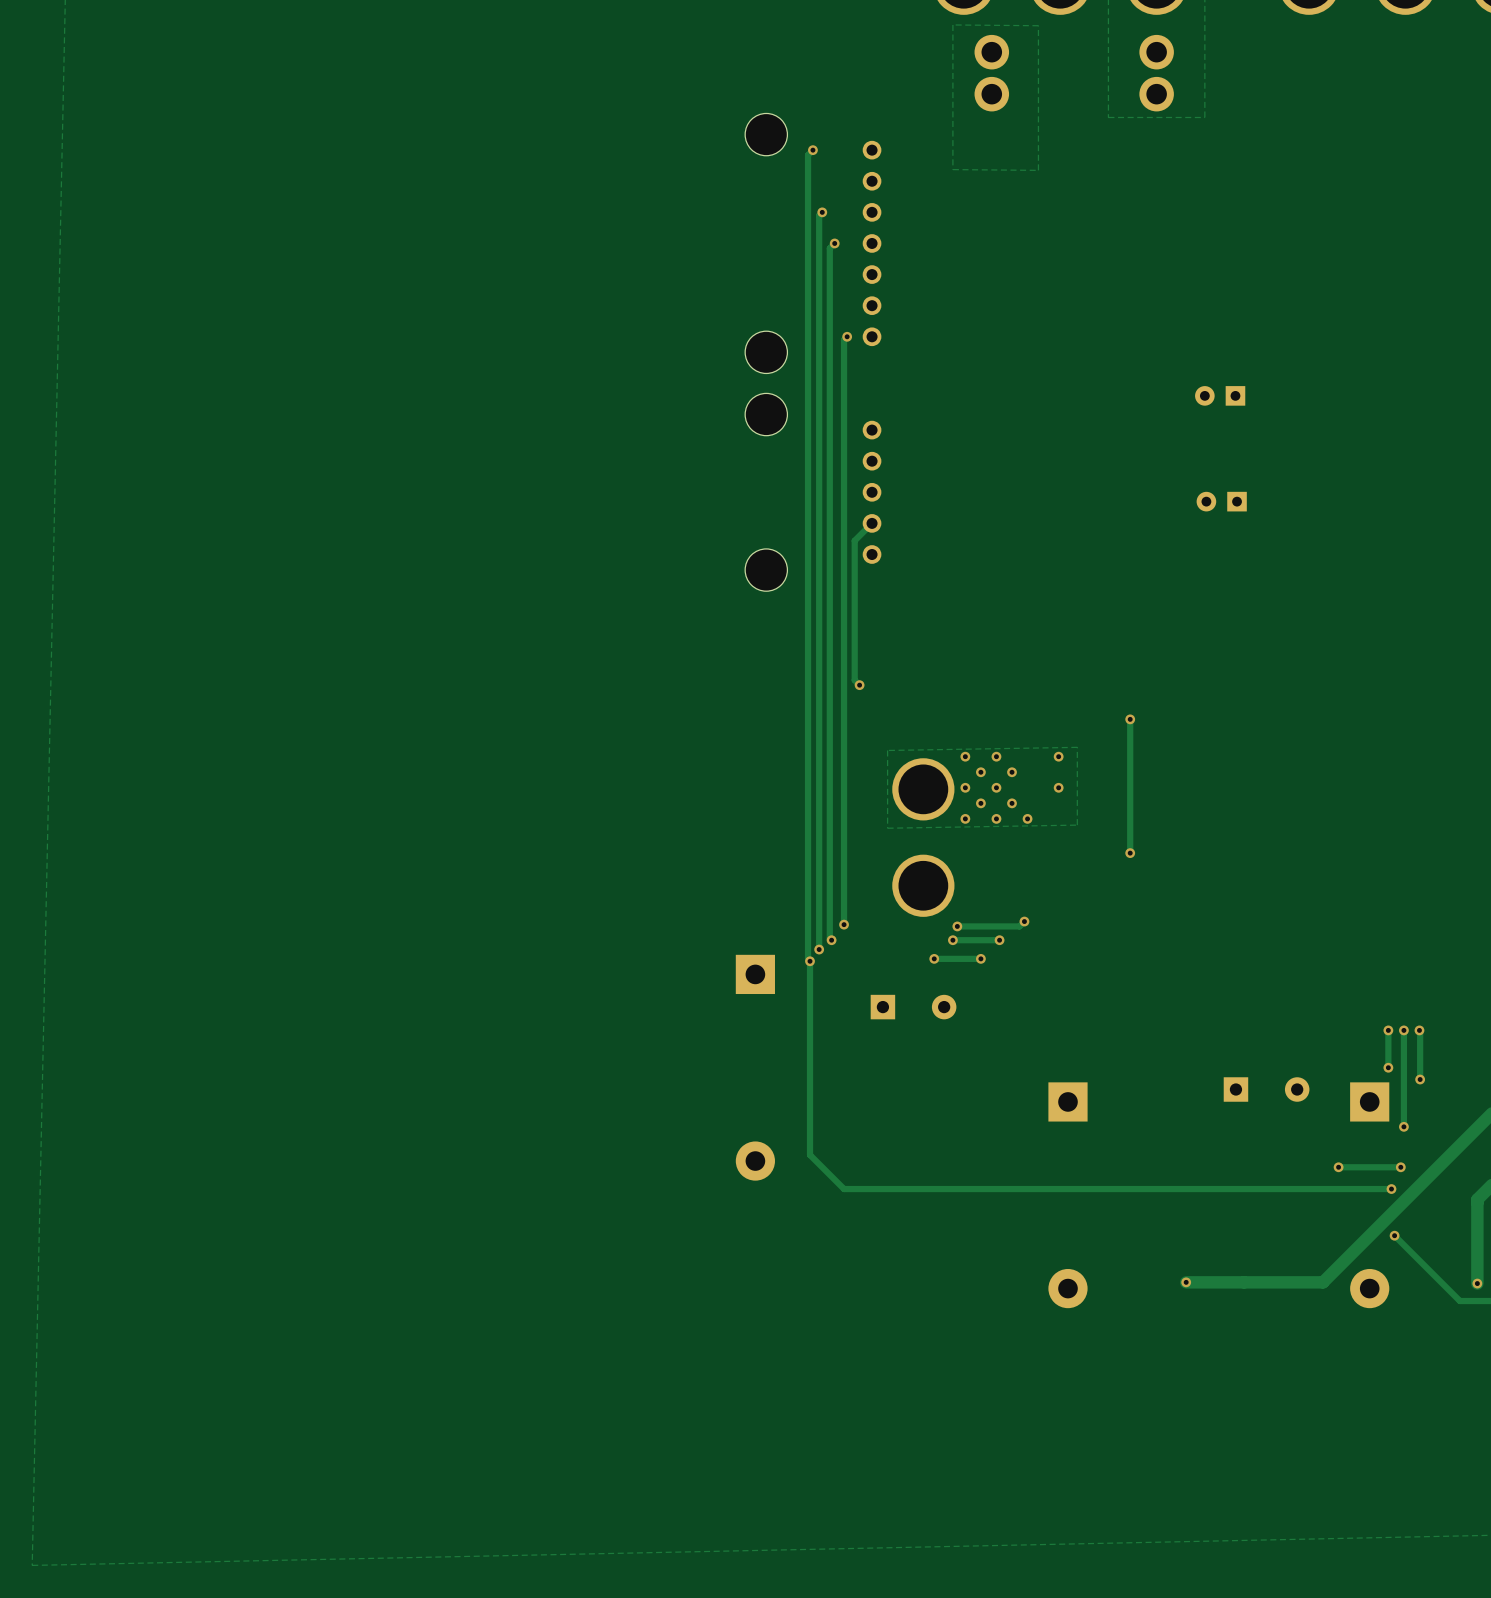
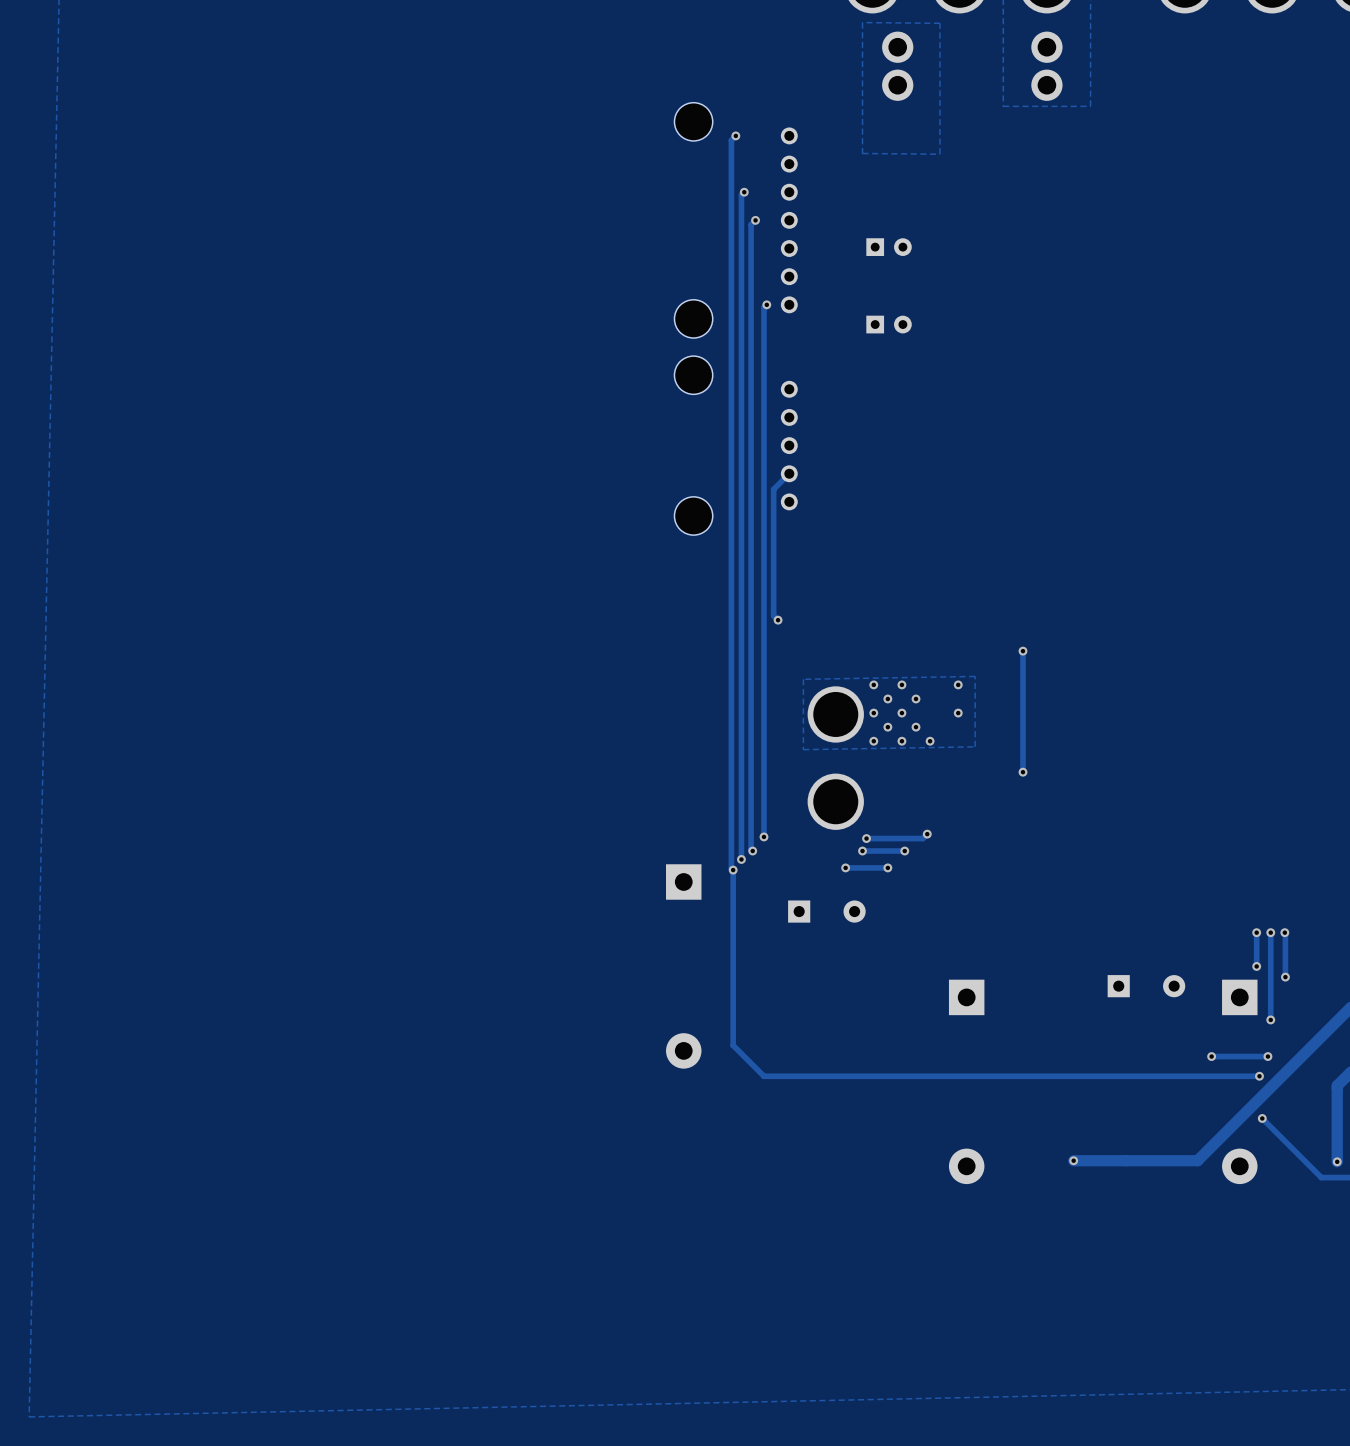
part: none -> (889, 247)
part: none -> (889, 324)
part: (1220, 395) -> none
part: (1221, 501) -> none

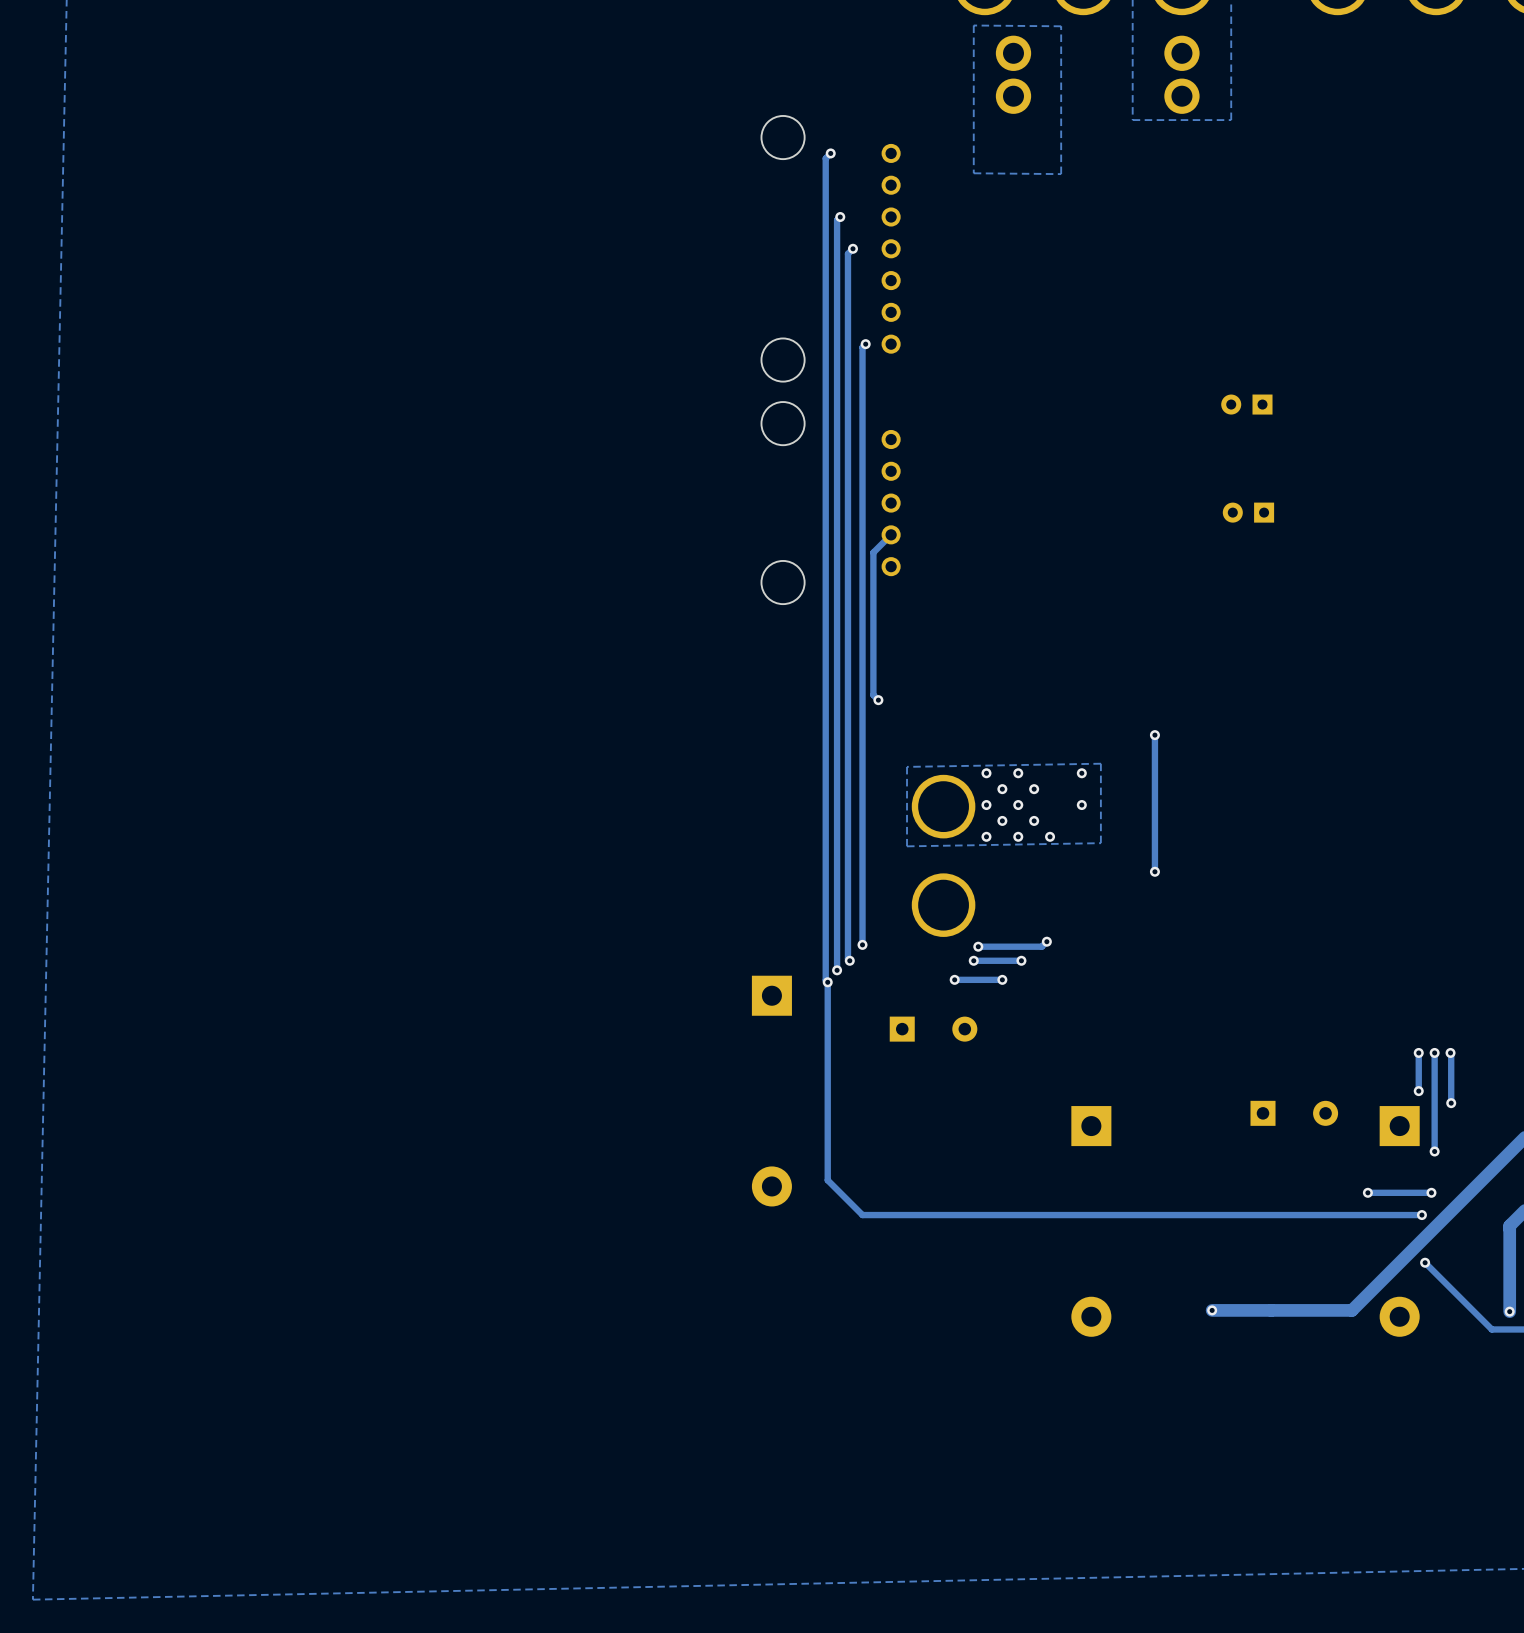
part: (889, 247) -> none
part: (889, 324) -> none
part: none -> (1246, 404)
part: none -> (1248, 512)

